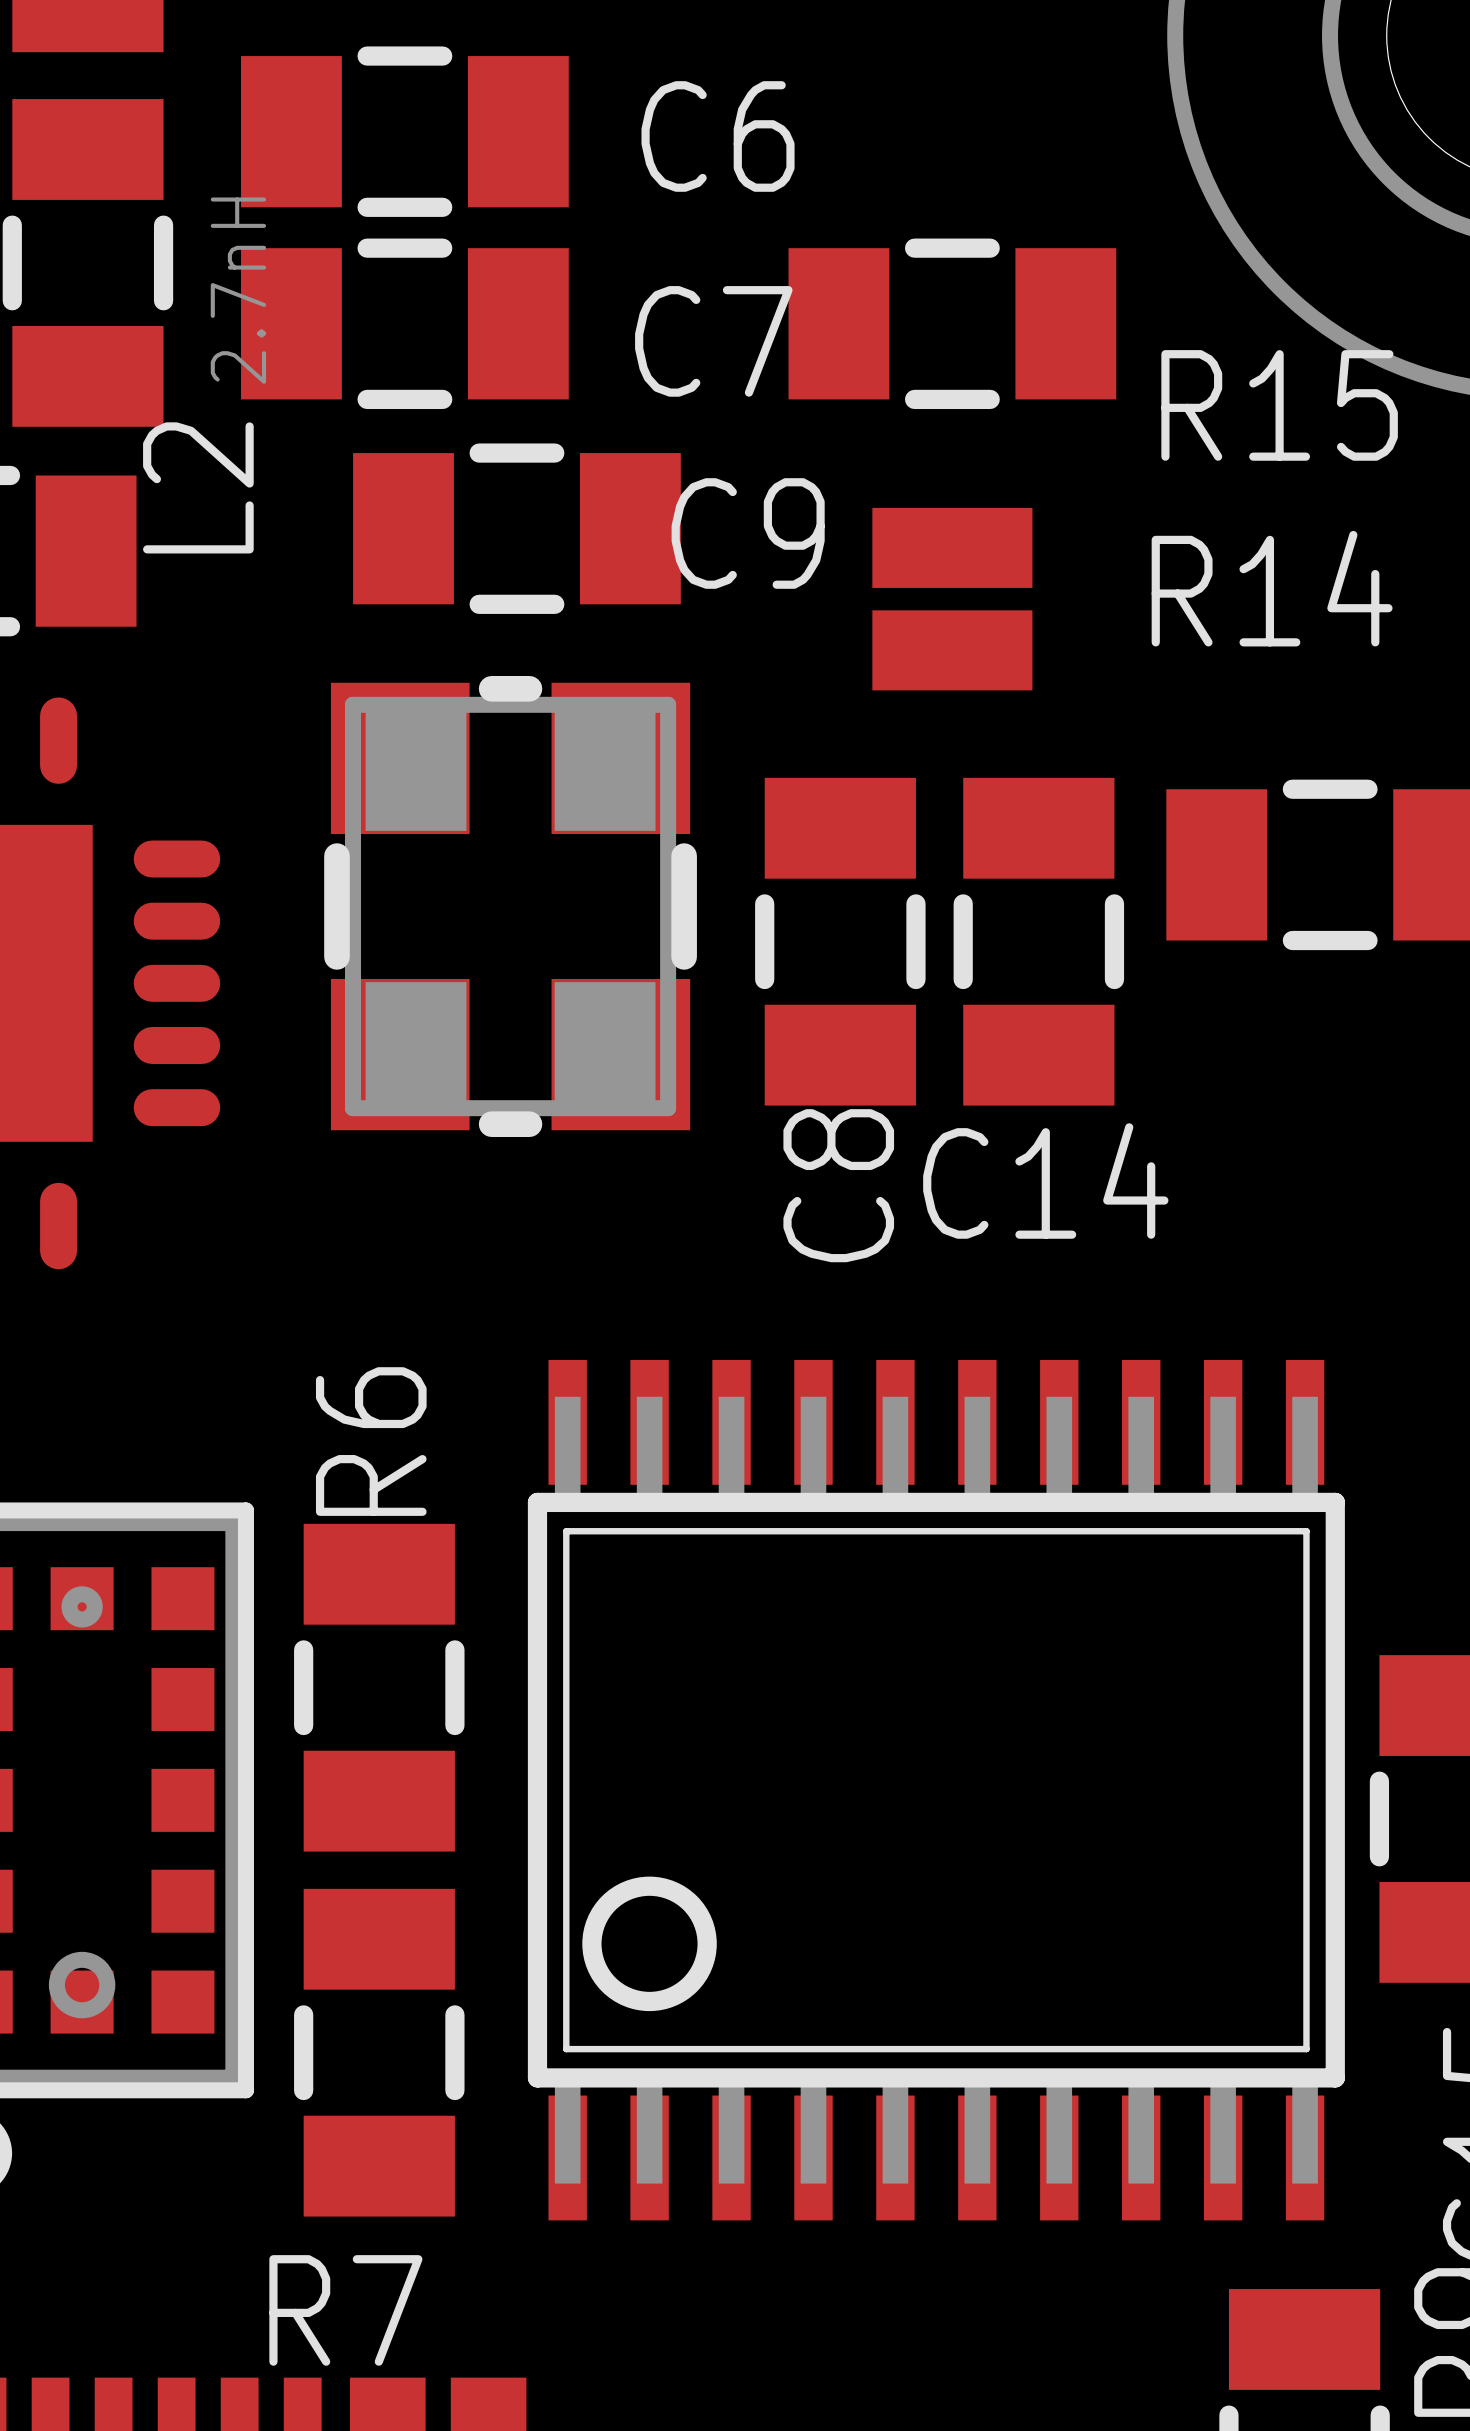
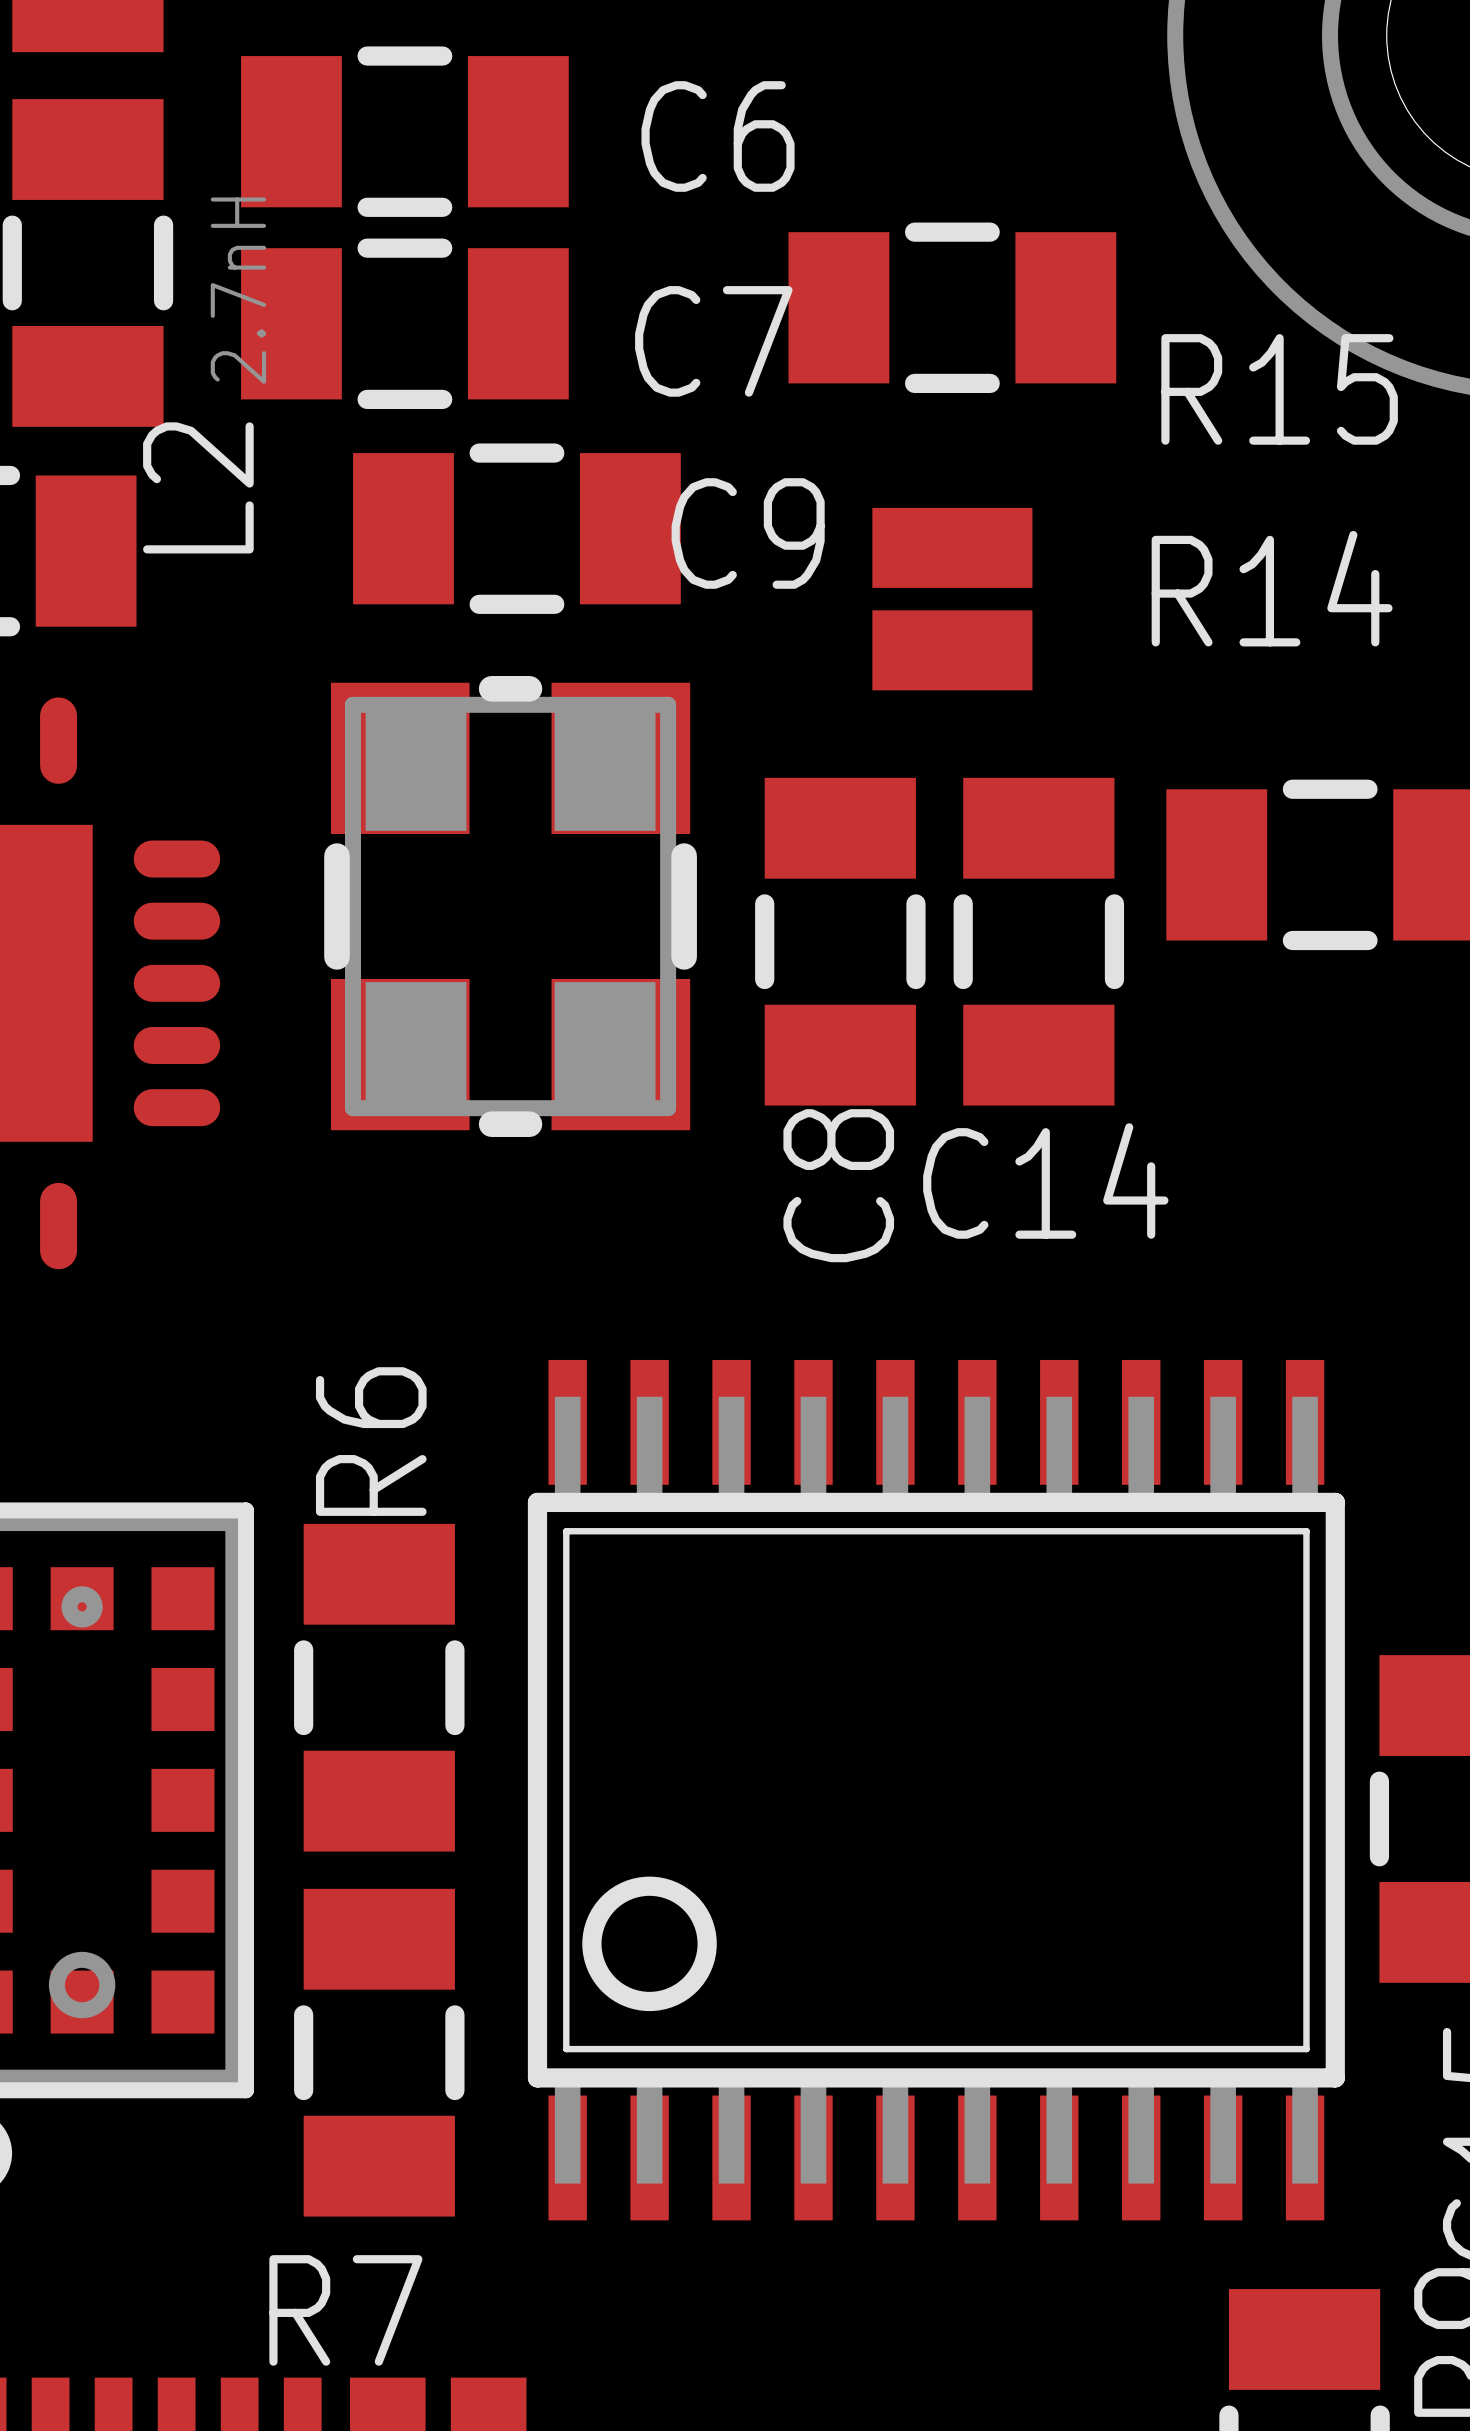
R15 position: (952, 323) -> (952, 307)

